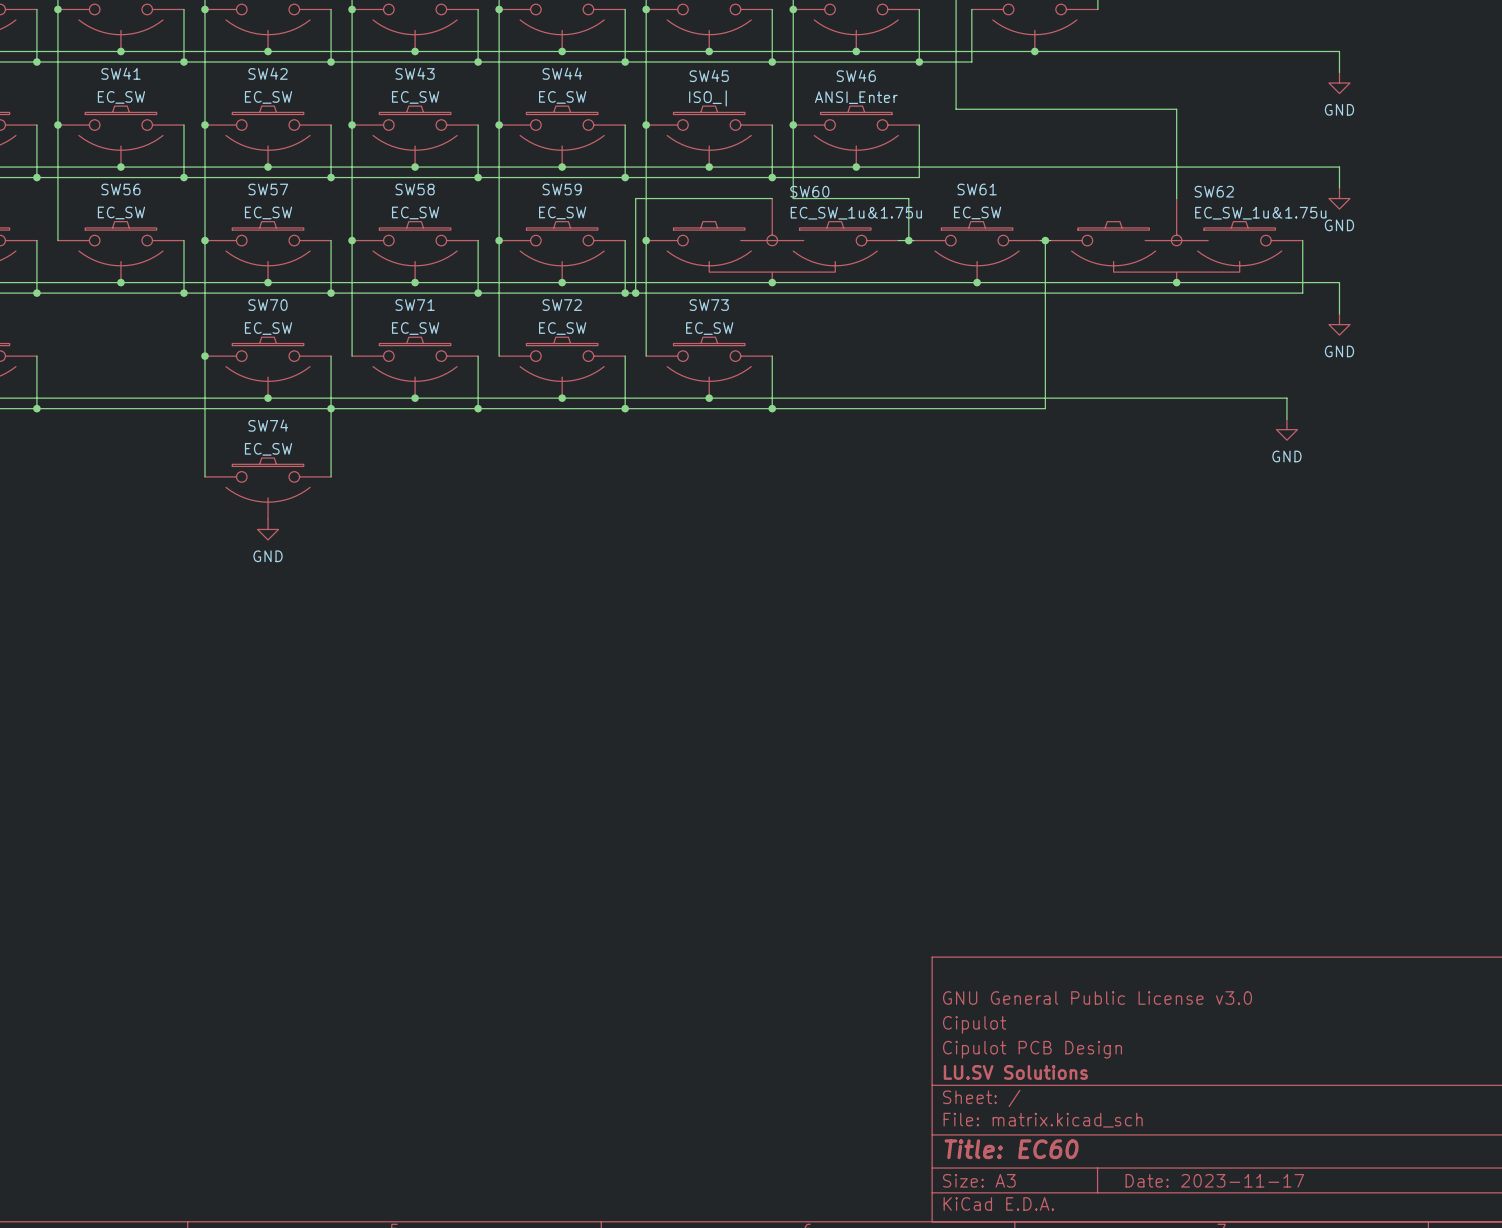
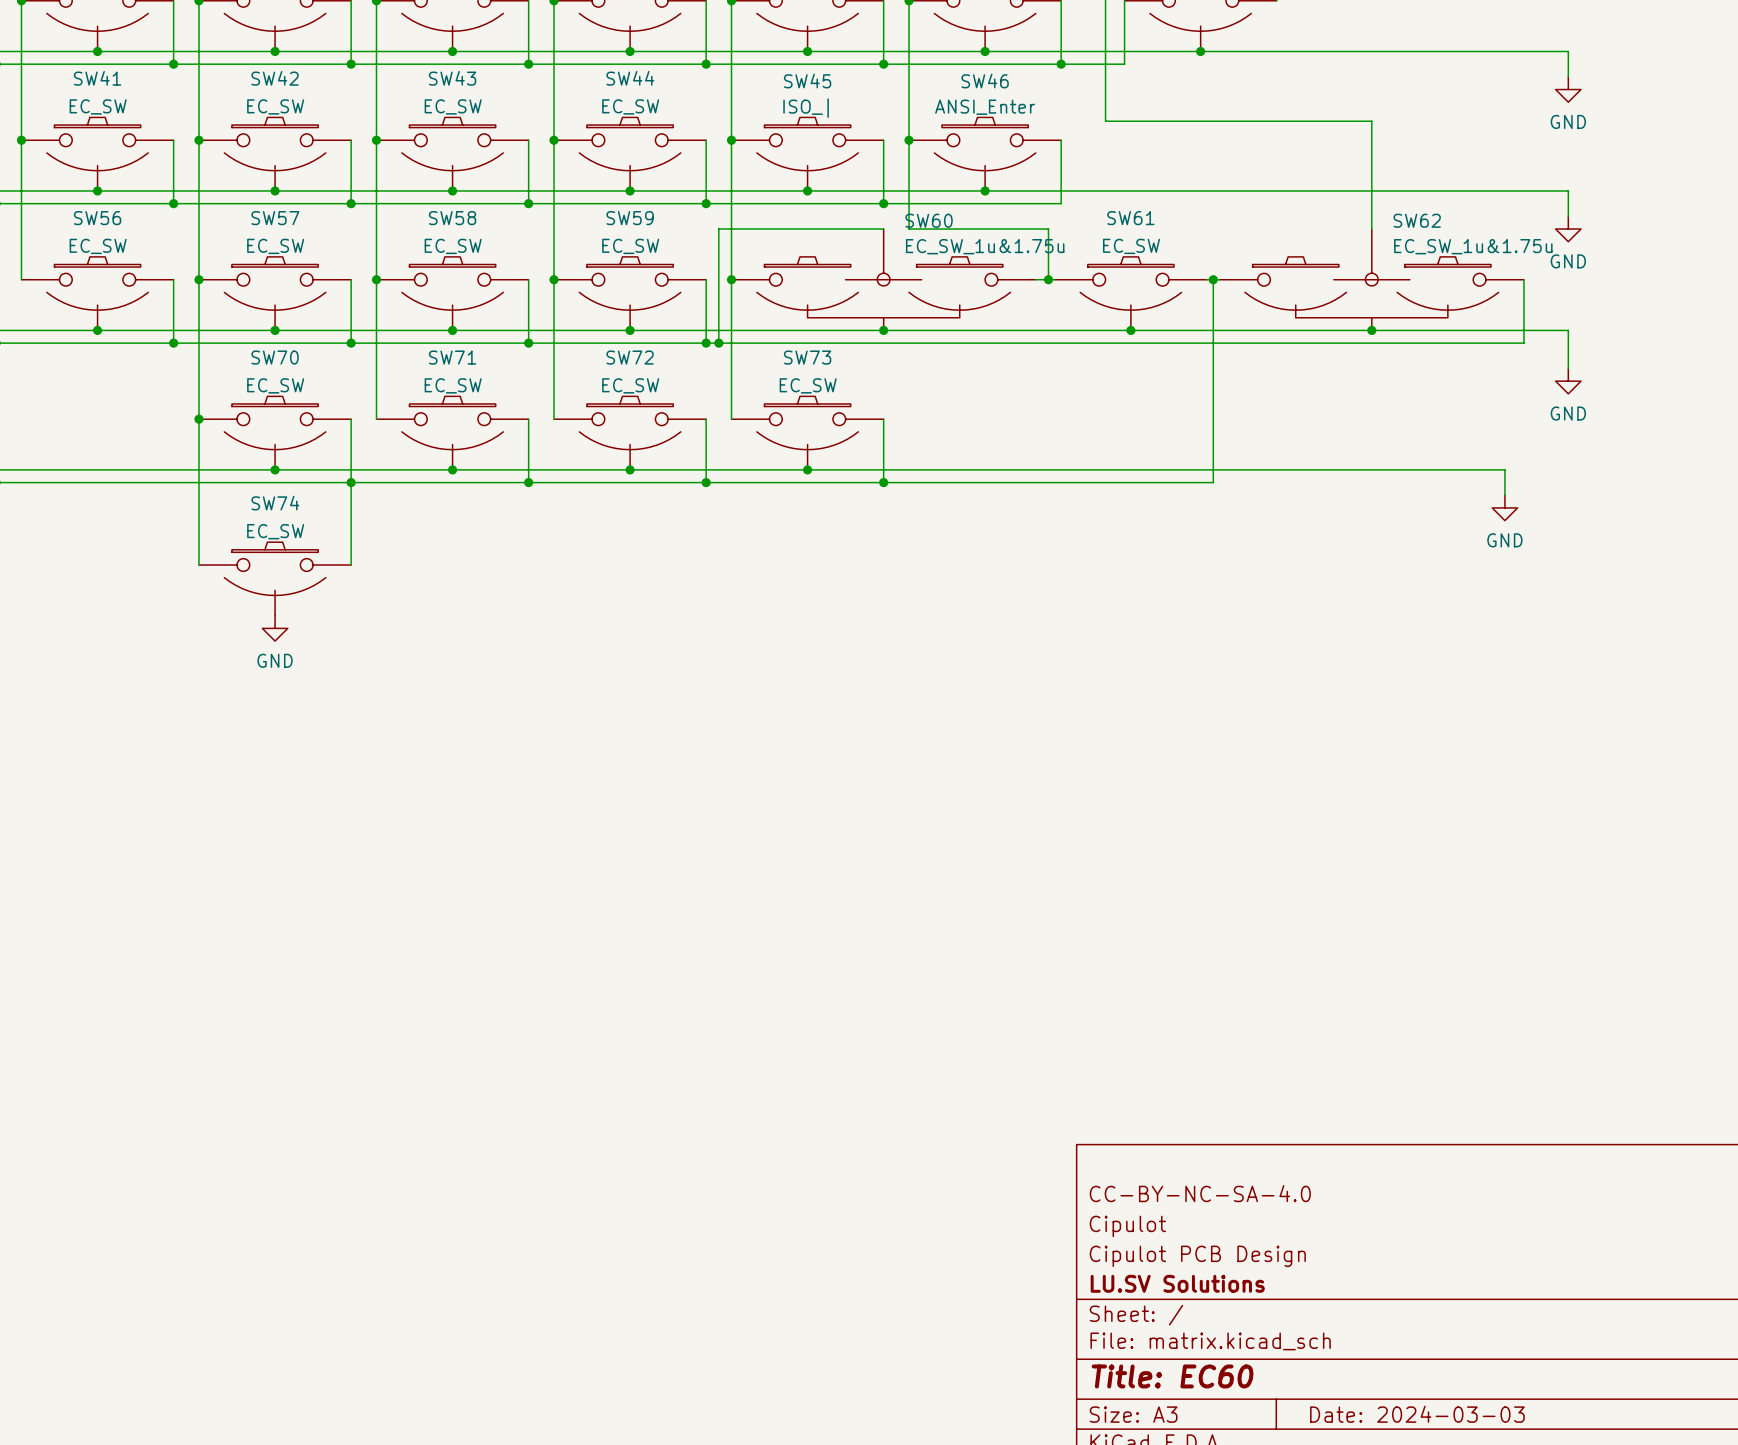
title block: GNU General Public License v3.0 (1097, 998) -> CC-BY-NC-SA-4.0 (1200, 1193)
title block: Date: 2023-11-17 (1214, 1180) -> Date: 2024-03-03 (1417, 1414)

